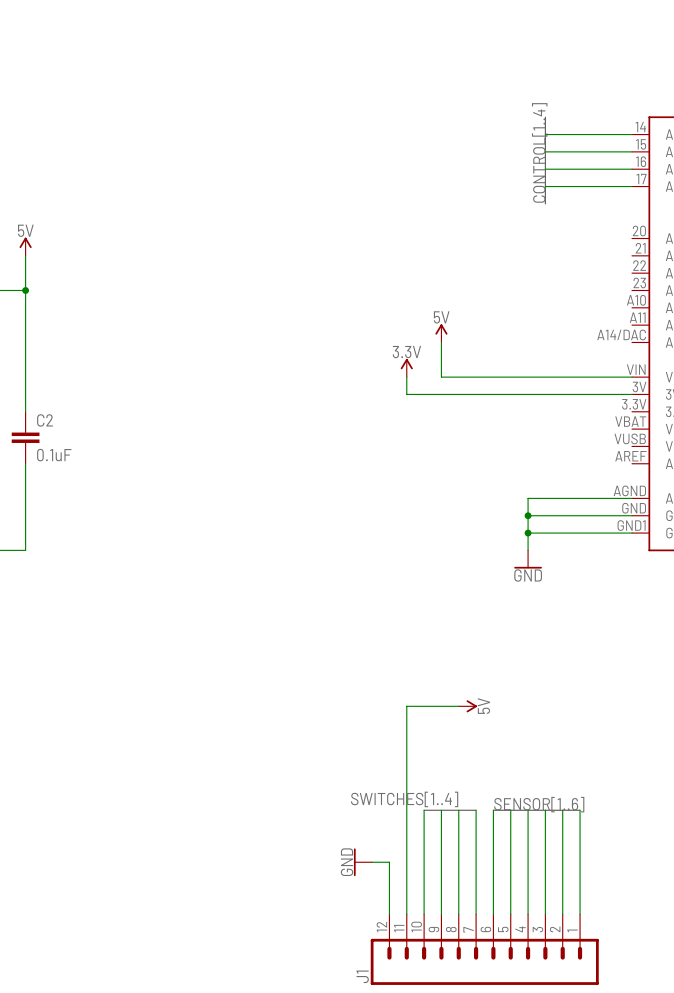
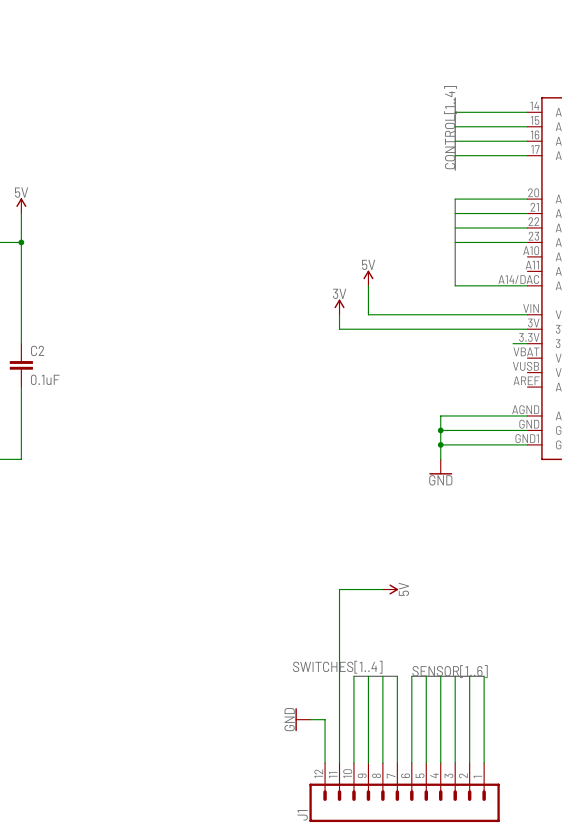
bus: none -> (455, 199) (455, 285)
wire: none -> (455, 199) (527, 199)
wire: none -> (455, 213) (527, 213)
wire: none -> (455, 227) (527, 227)
wire: none -> (455, 242) (527, 242)
wire: none -> (455, 285) (527, 285)
power symbol: 3.3V (406, 368) -> 3V (339, 307)
wire: none -> (513, 343) (527, 343)

